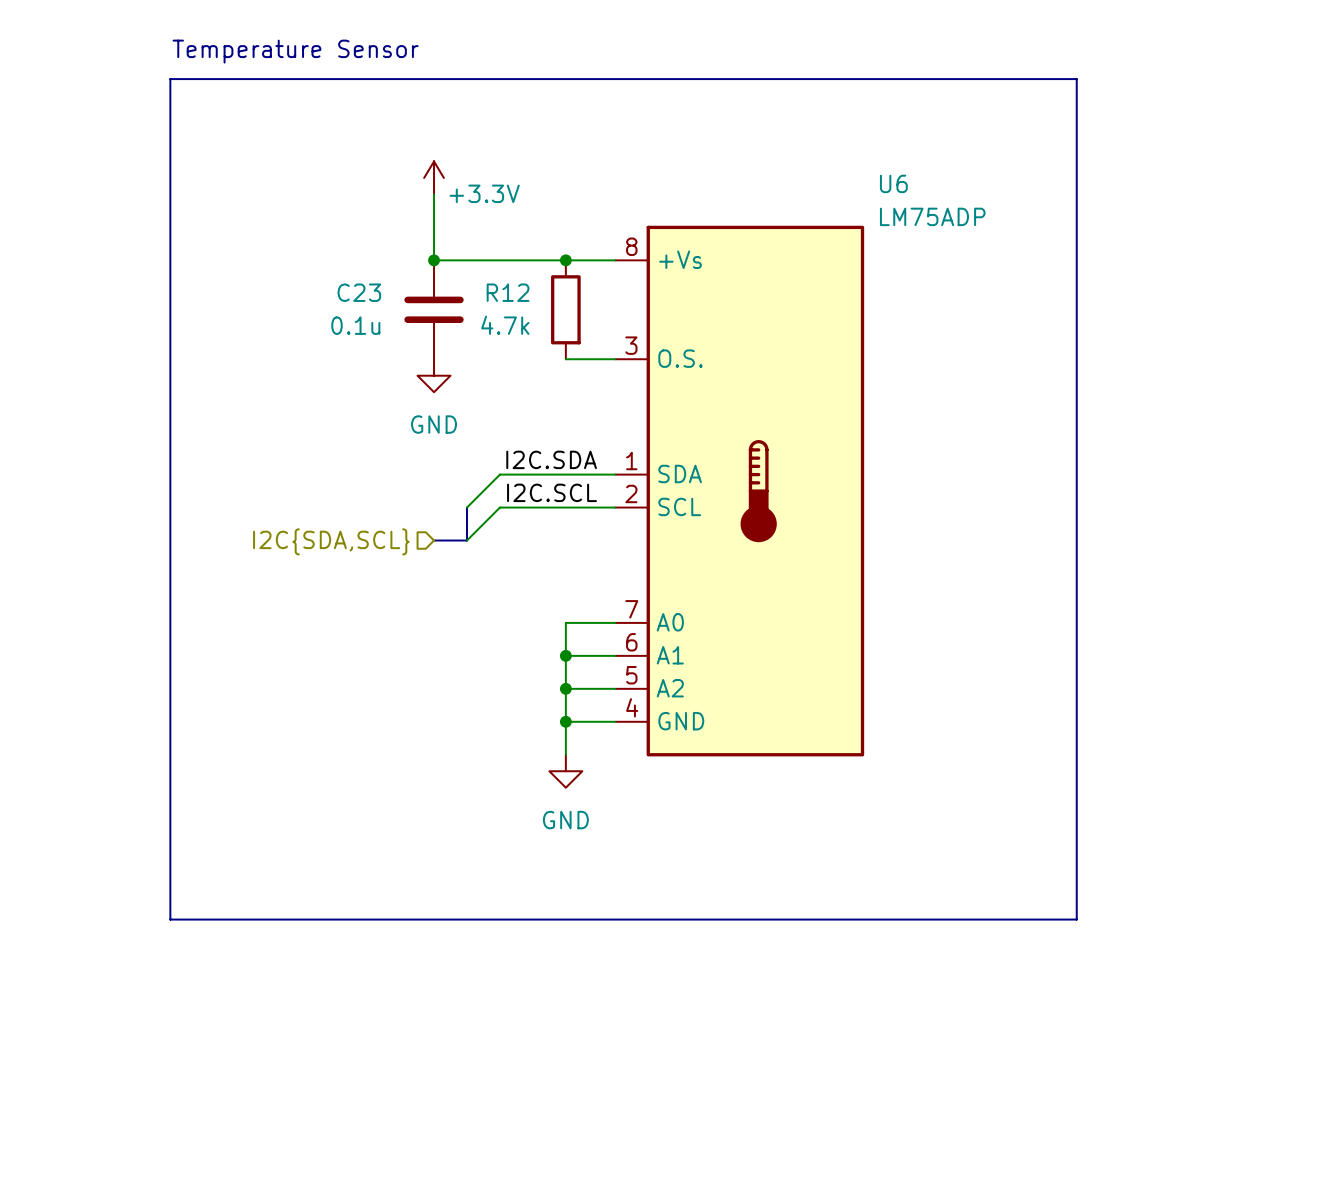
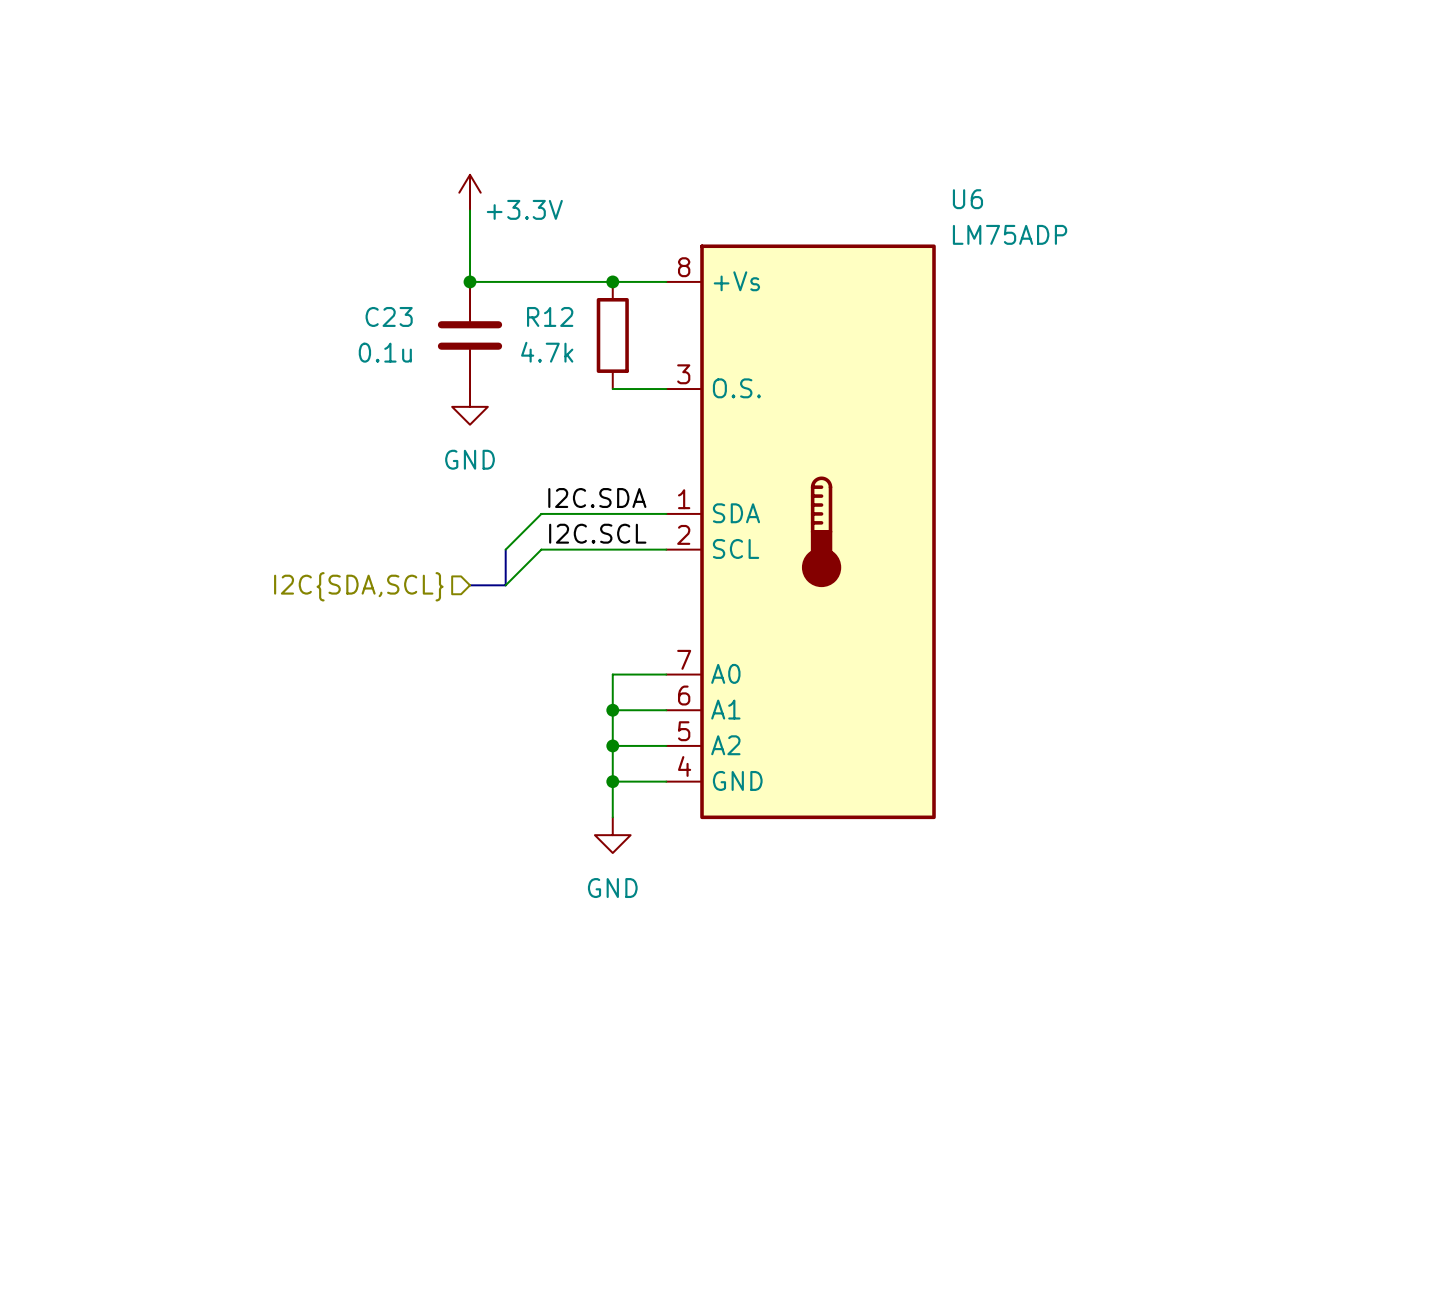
text: Temperature Sensor (295, 51) -> none
line: (170, 79) (1076, 79) (1076, 919) (170, 919) (170, 79) -> none

